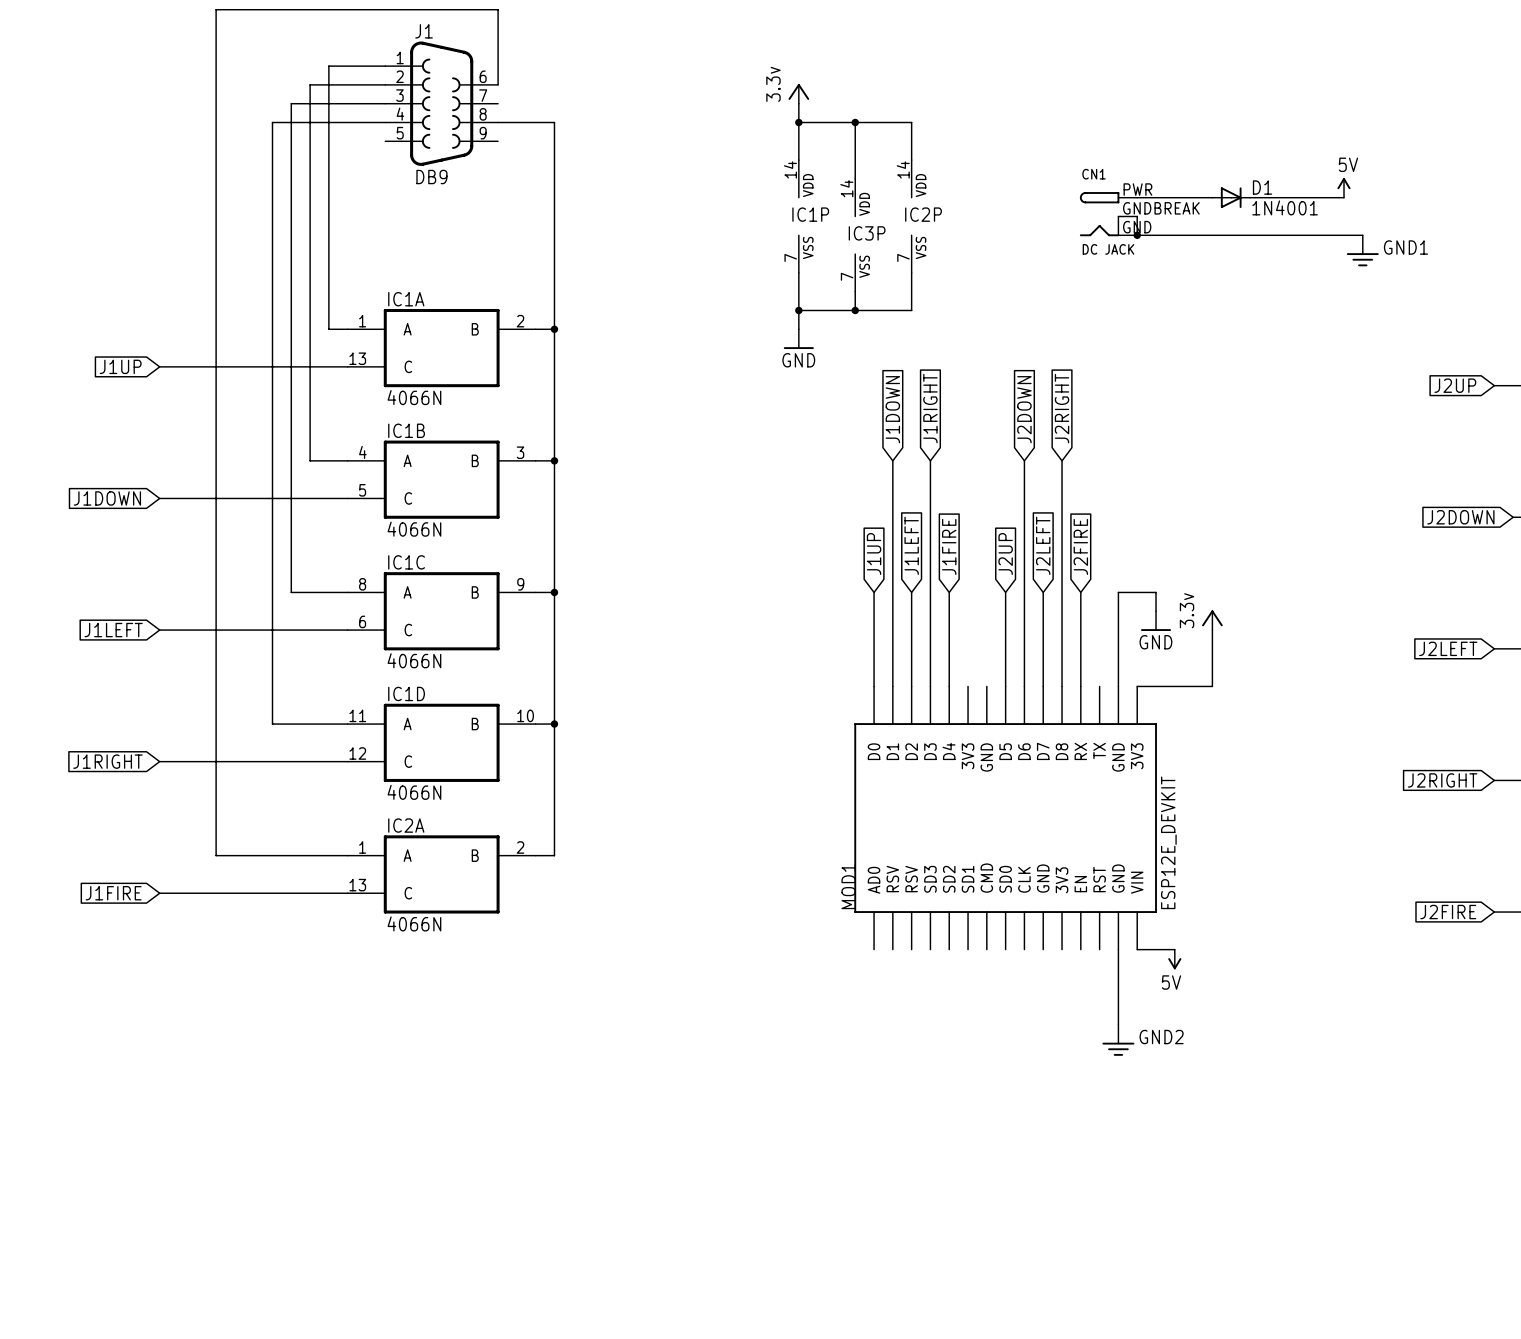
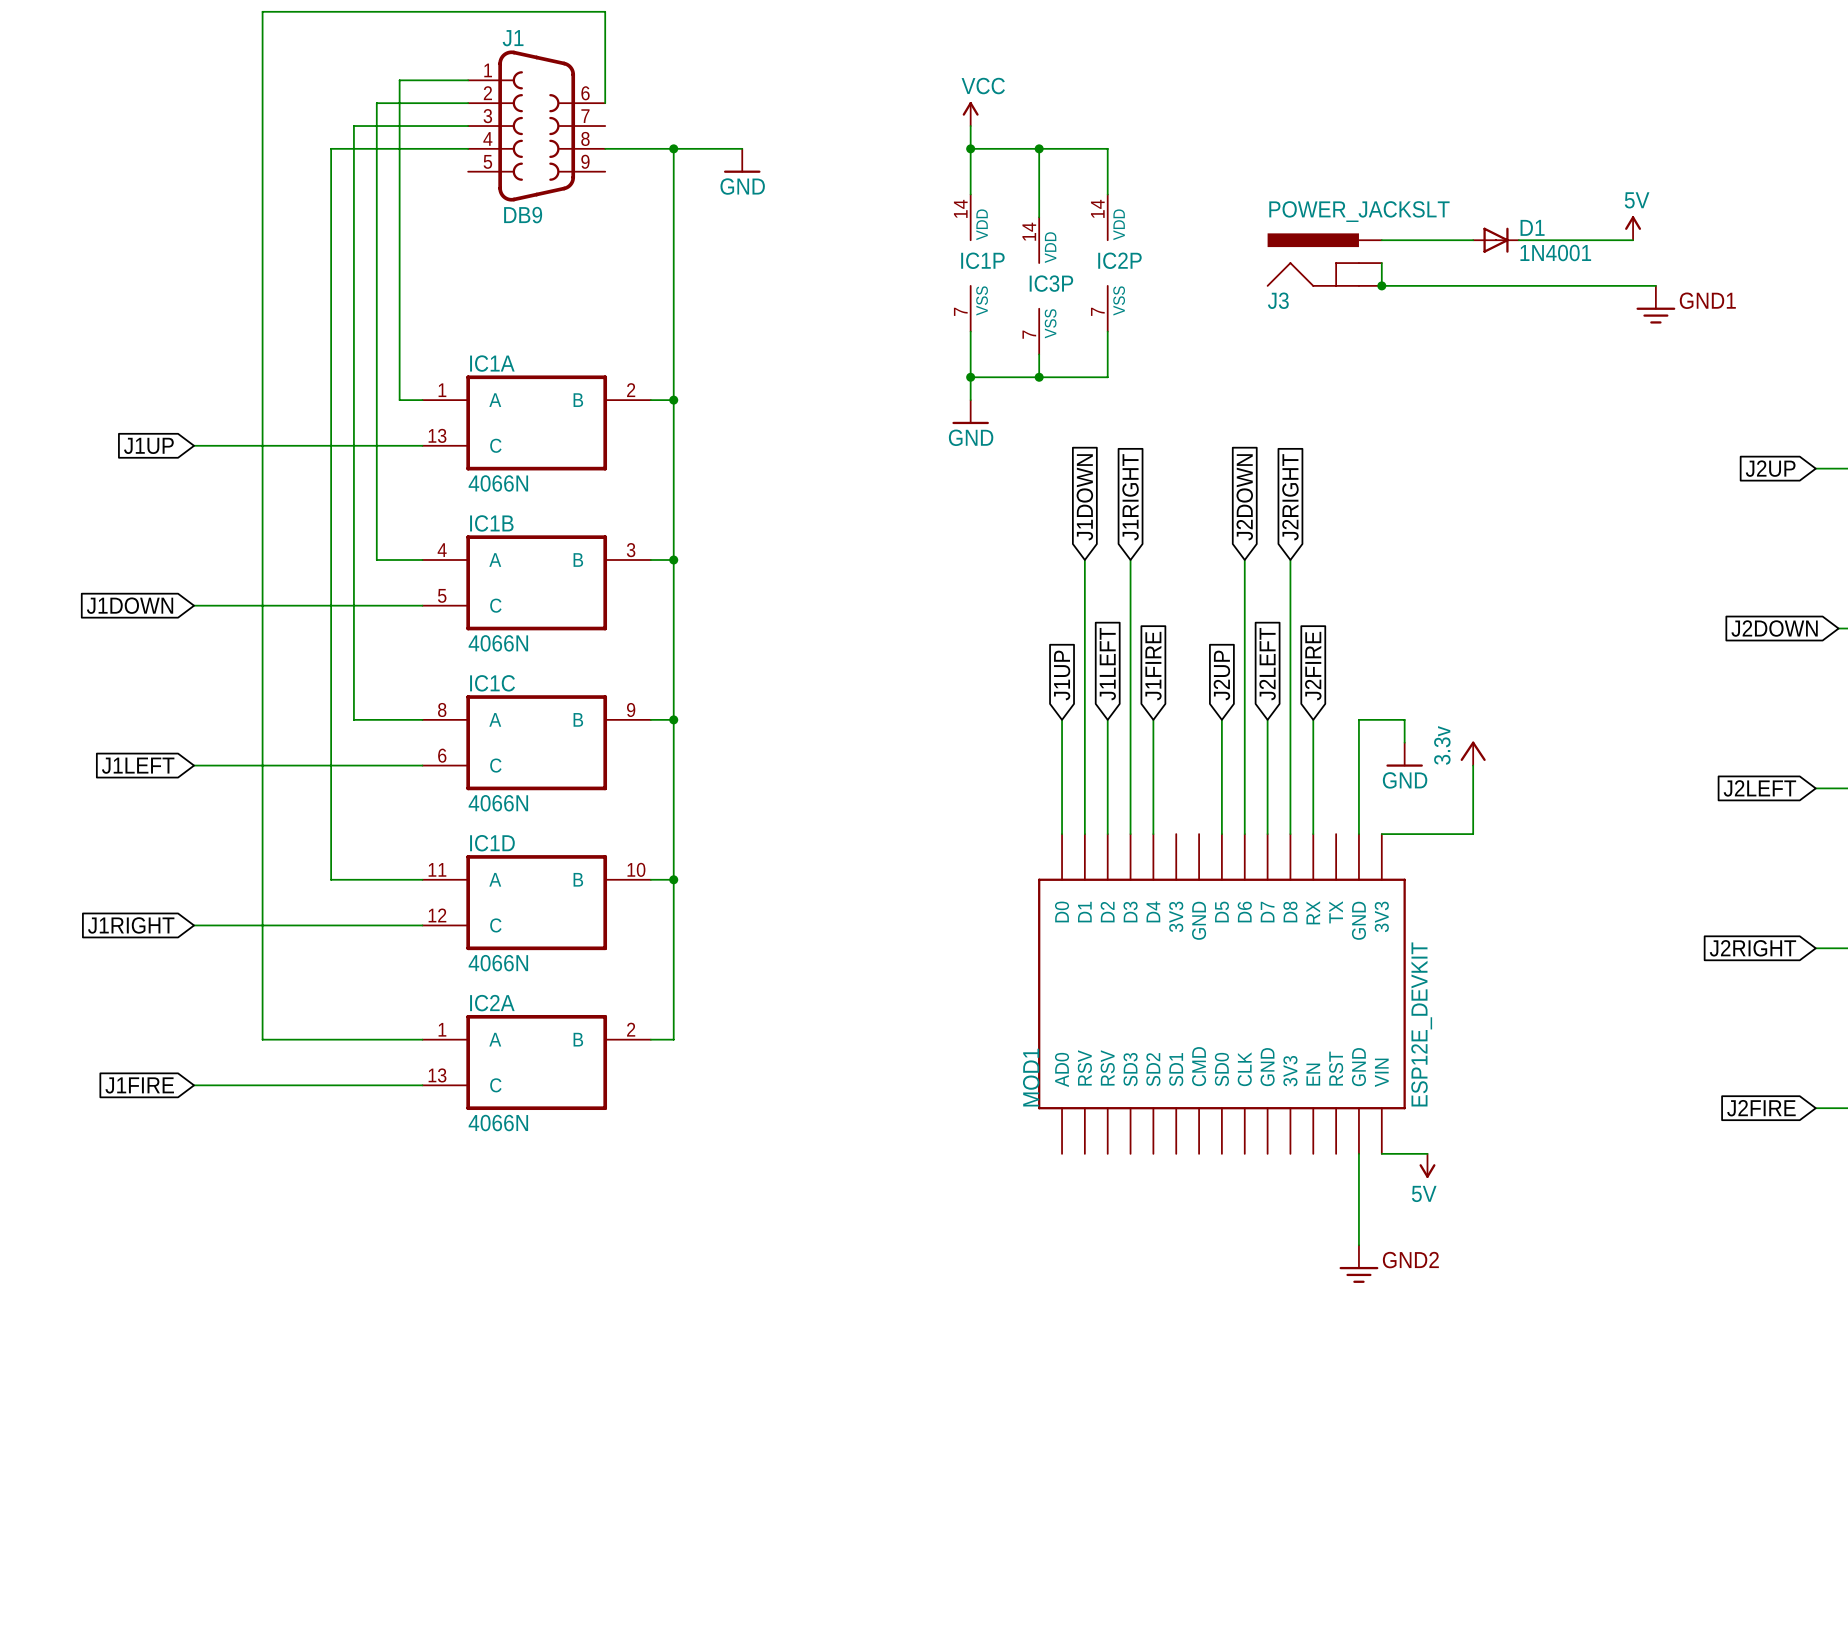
power symbol: 3.3v (798, 93) -> VCC (970, 114)
wire: none -> (673, 148) (742, 148)
junction: none -> (673, 148)
power symbol: none -> GND (742, 160)
J3: none -> POWER_JACKSLT (1324, 259)
CN1: DC JACK (1108, 214) -> none

